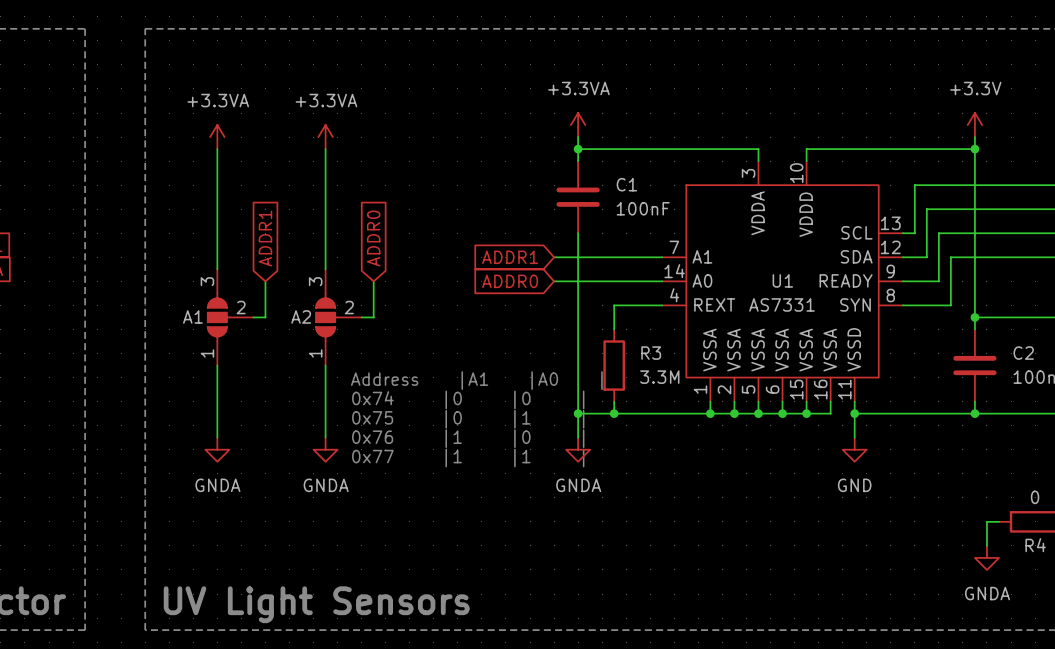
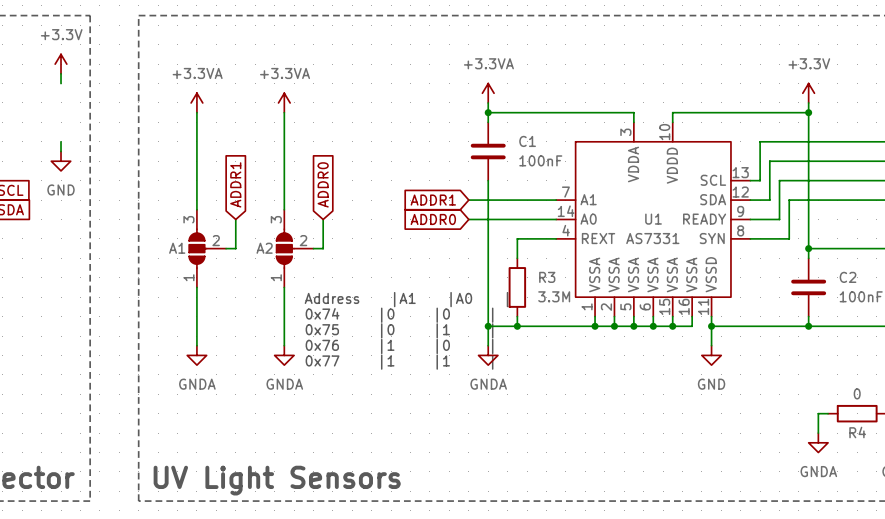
power symbol: none -> +3.3V (61, 64)
wire: none -> (61, 73) (61, 83)
wire: none -> (61, 141) (61, 151)
power symbol: none -> GND (61, 161)

